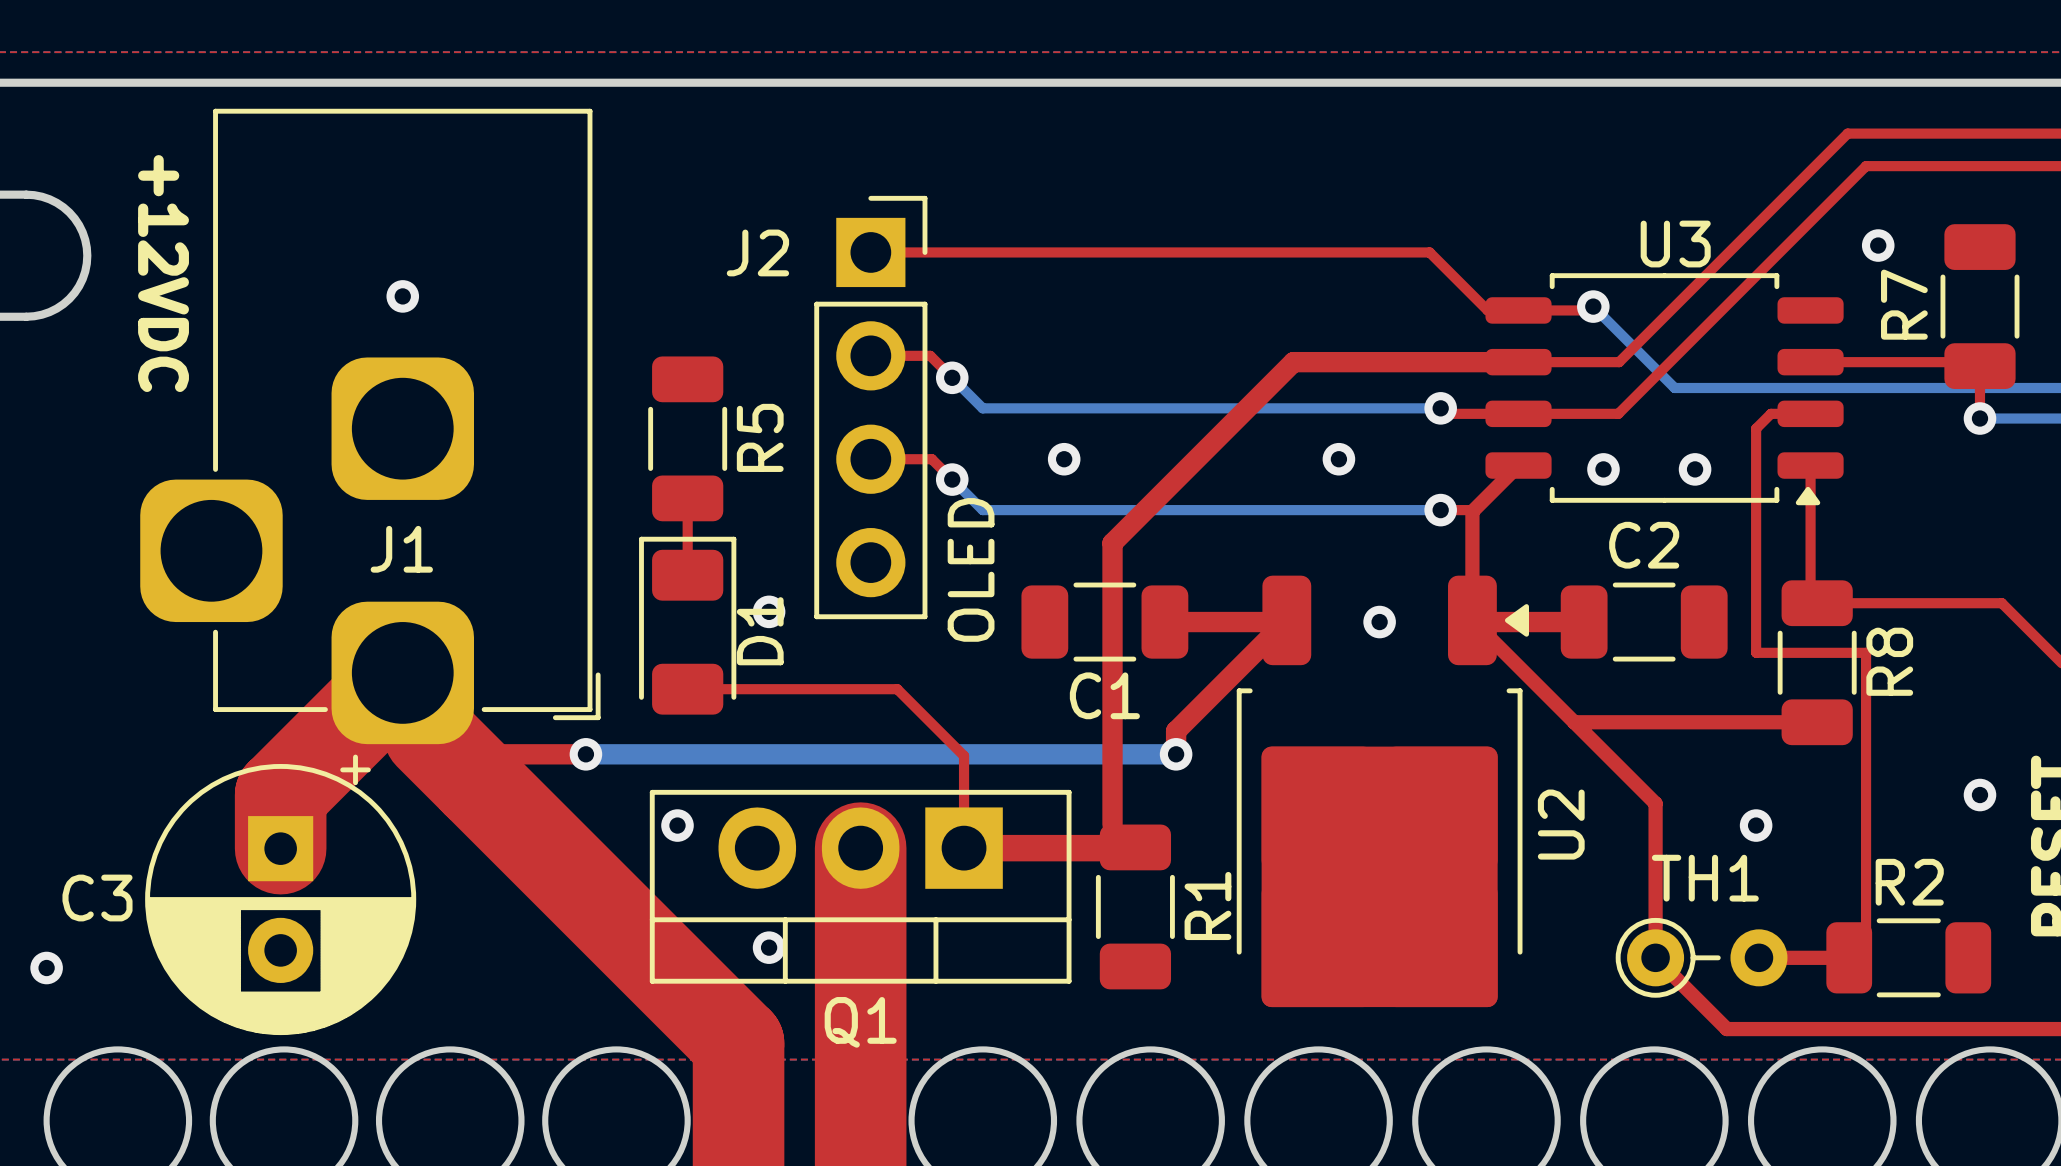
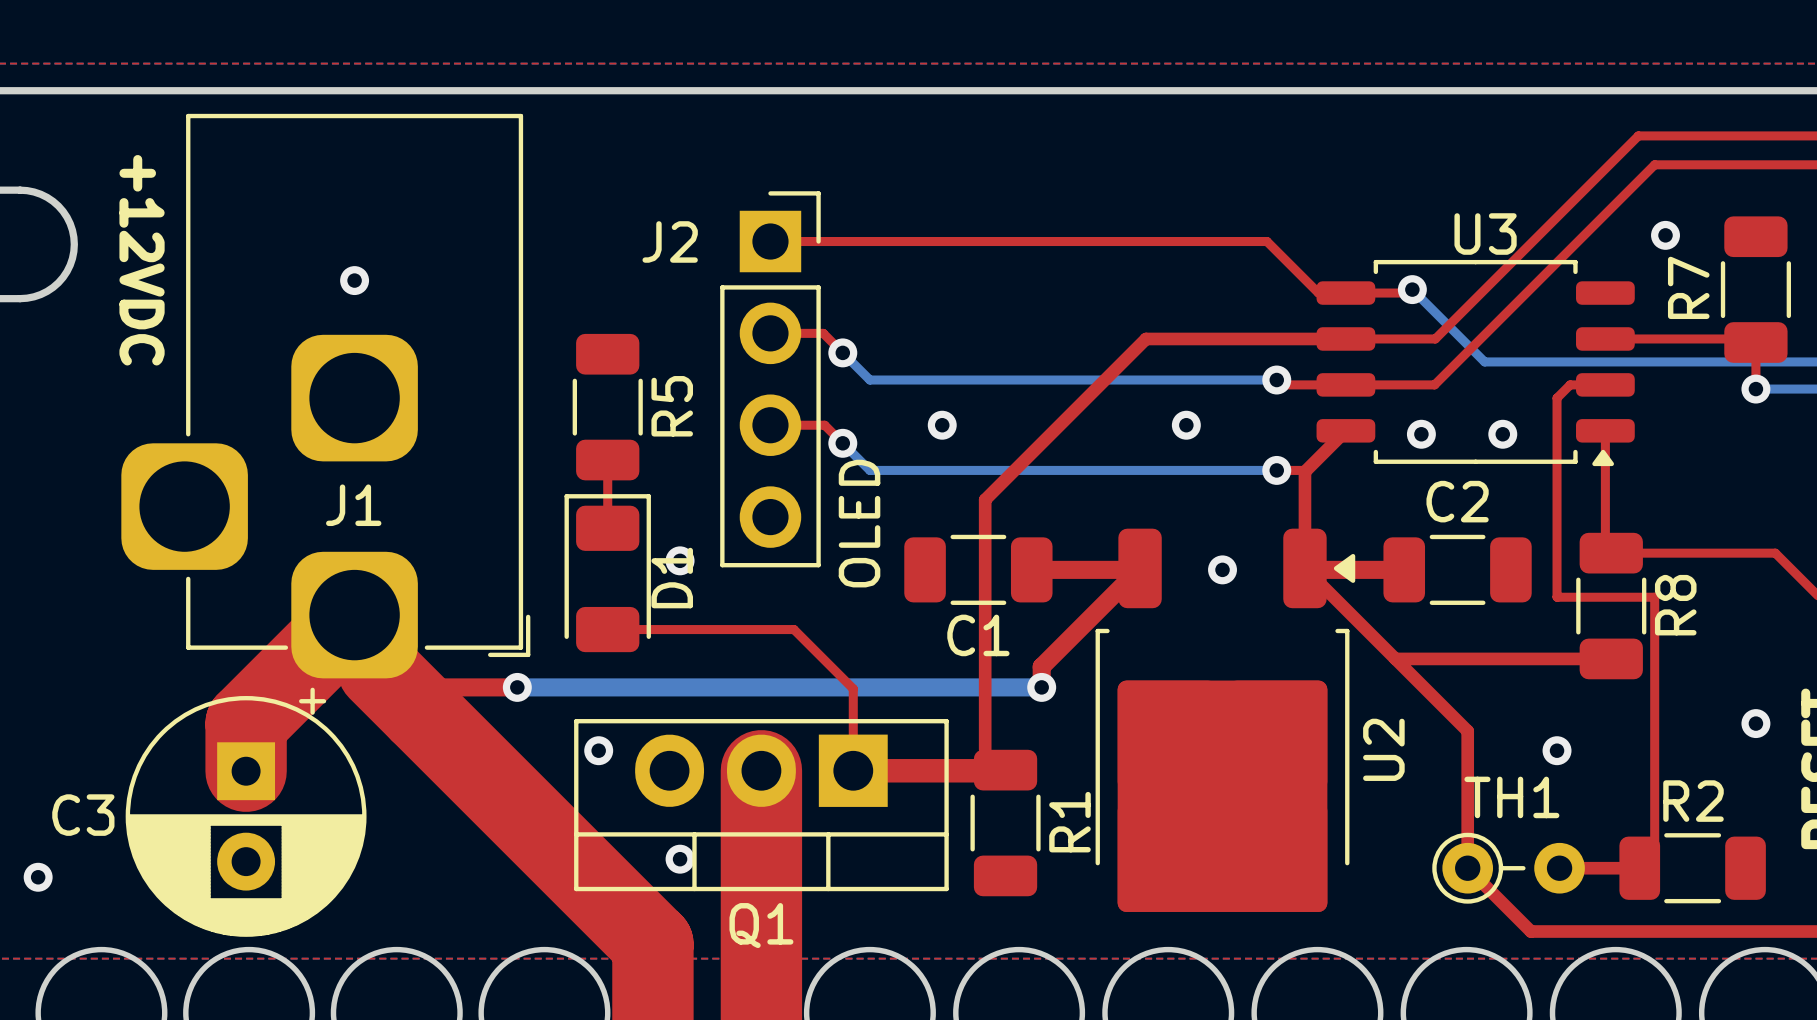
top track width: thick (1518, 362) (1293, 362) (1112, 543) (1112, 824) -> thin (1345, 338) (1146, 338) (985, 499) (985, 749)

